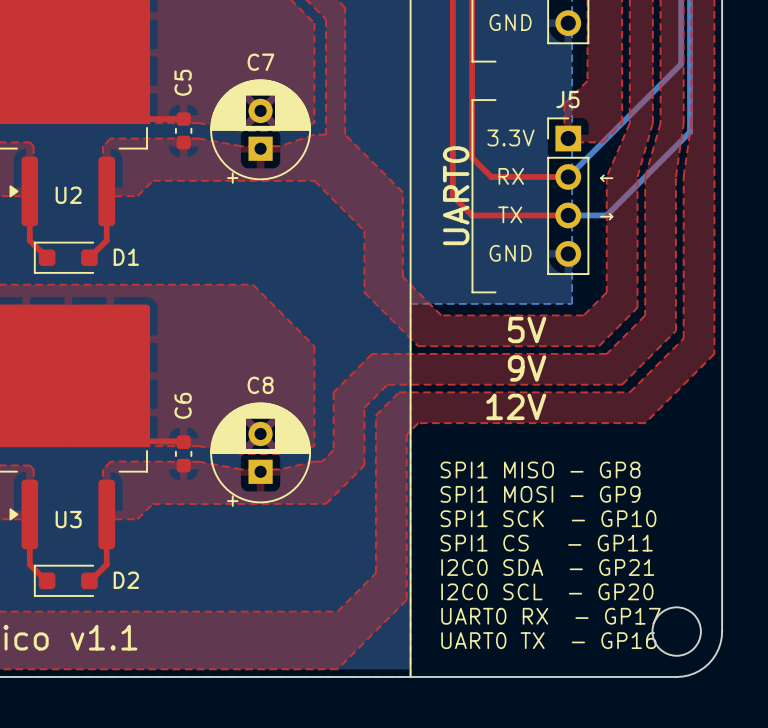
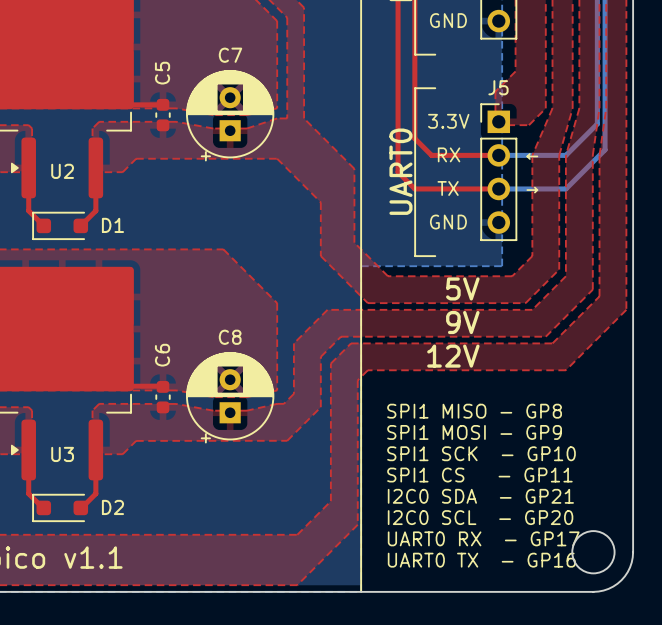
bottom track: (681, 64) (568, 176) -> none
bottom track: (690, 132) (681, 140) -> (597, 56) (597, 123)
bottom track: none -> (605, 116) (605, 149) (565, 188) (532, 188)
bottom track: (645, 176) (606, 215) -> (565, 155) (498, 155)

